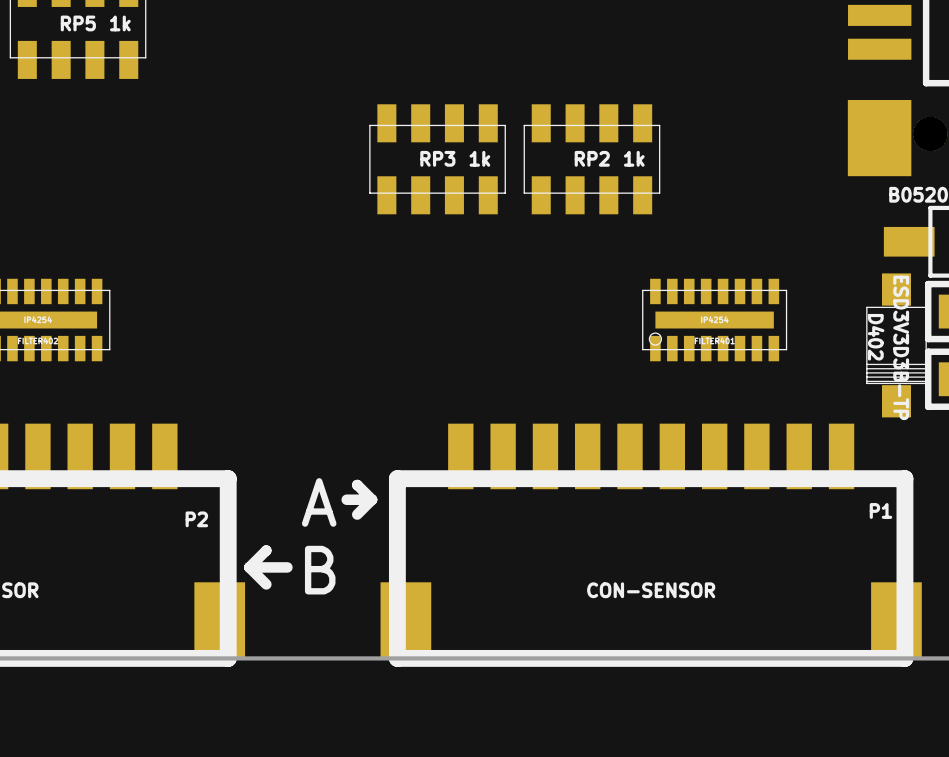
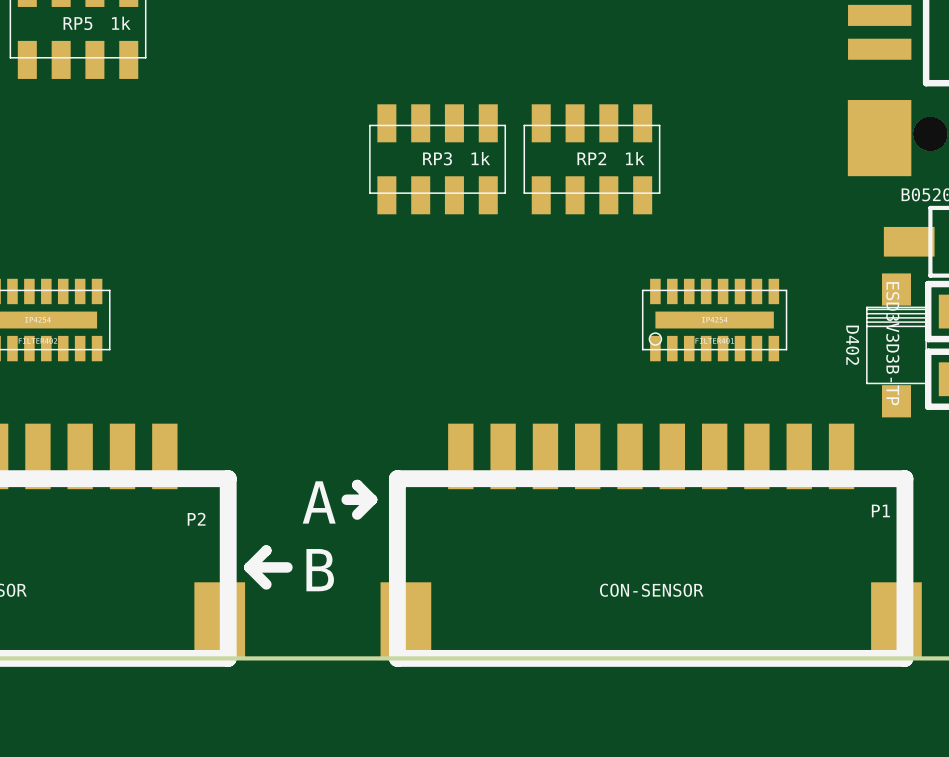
D402 rotation: 0° (896, 345) -> 180° (896, 345)

